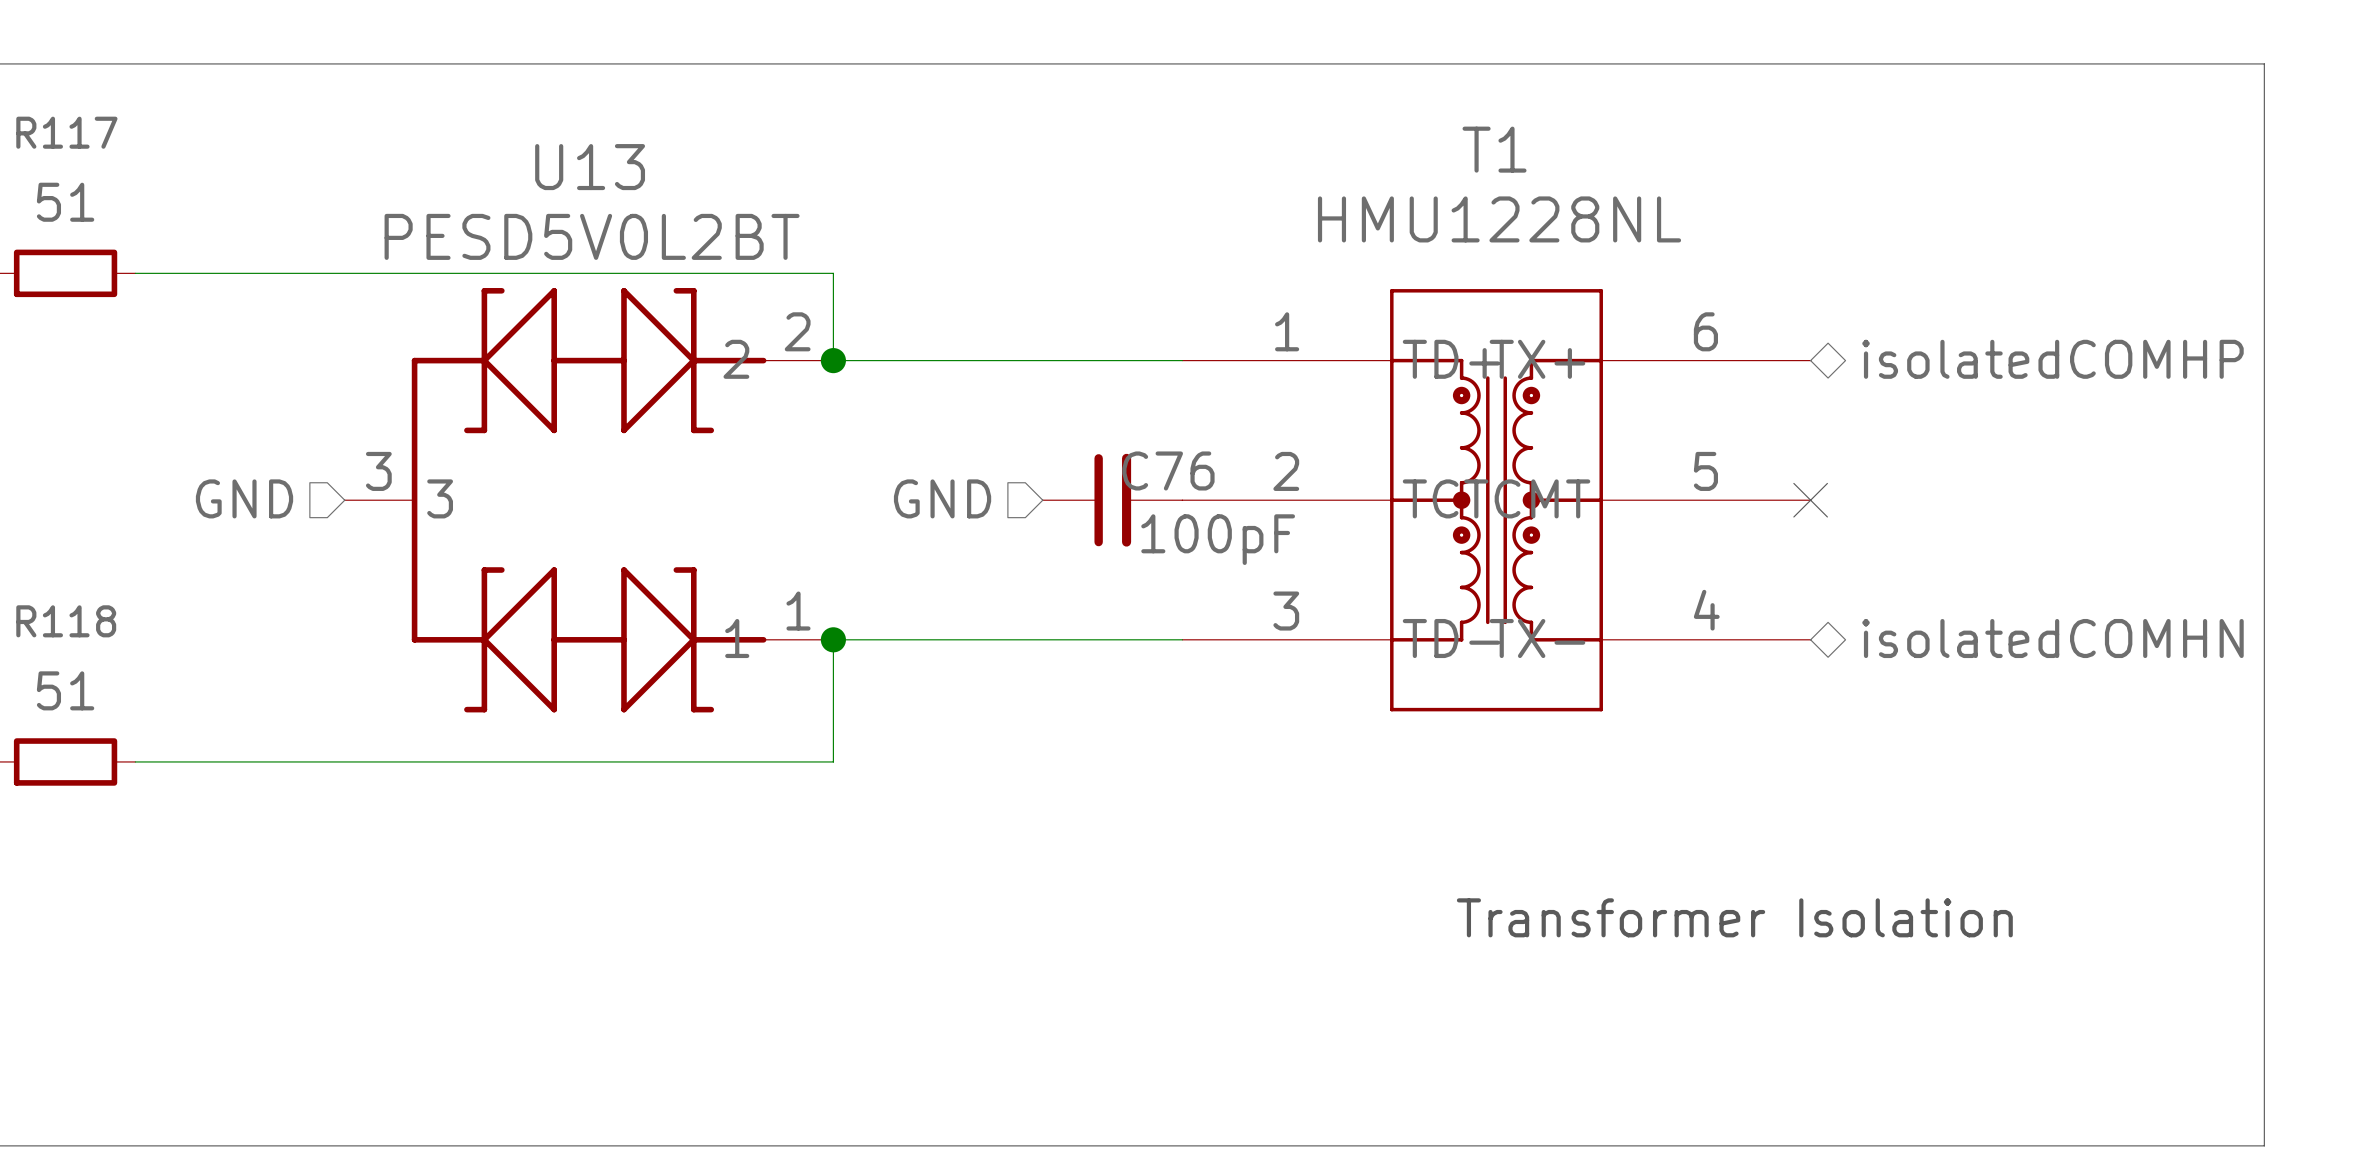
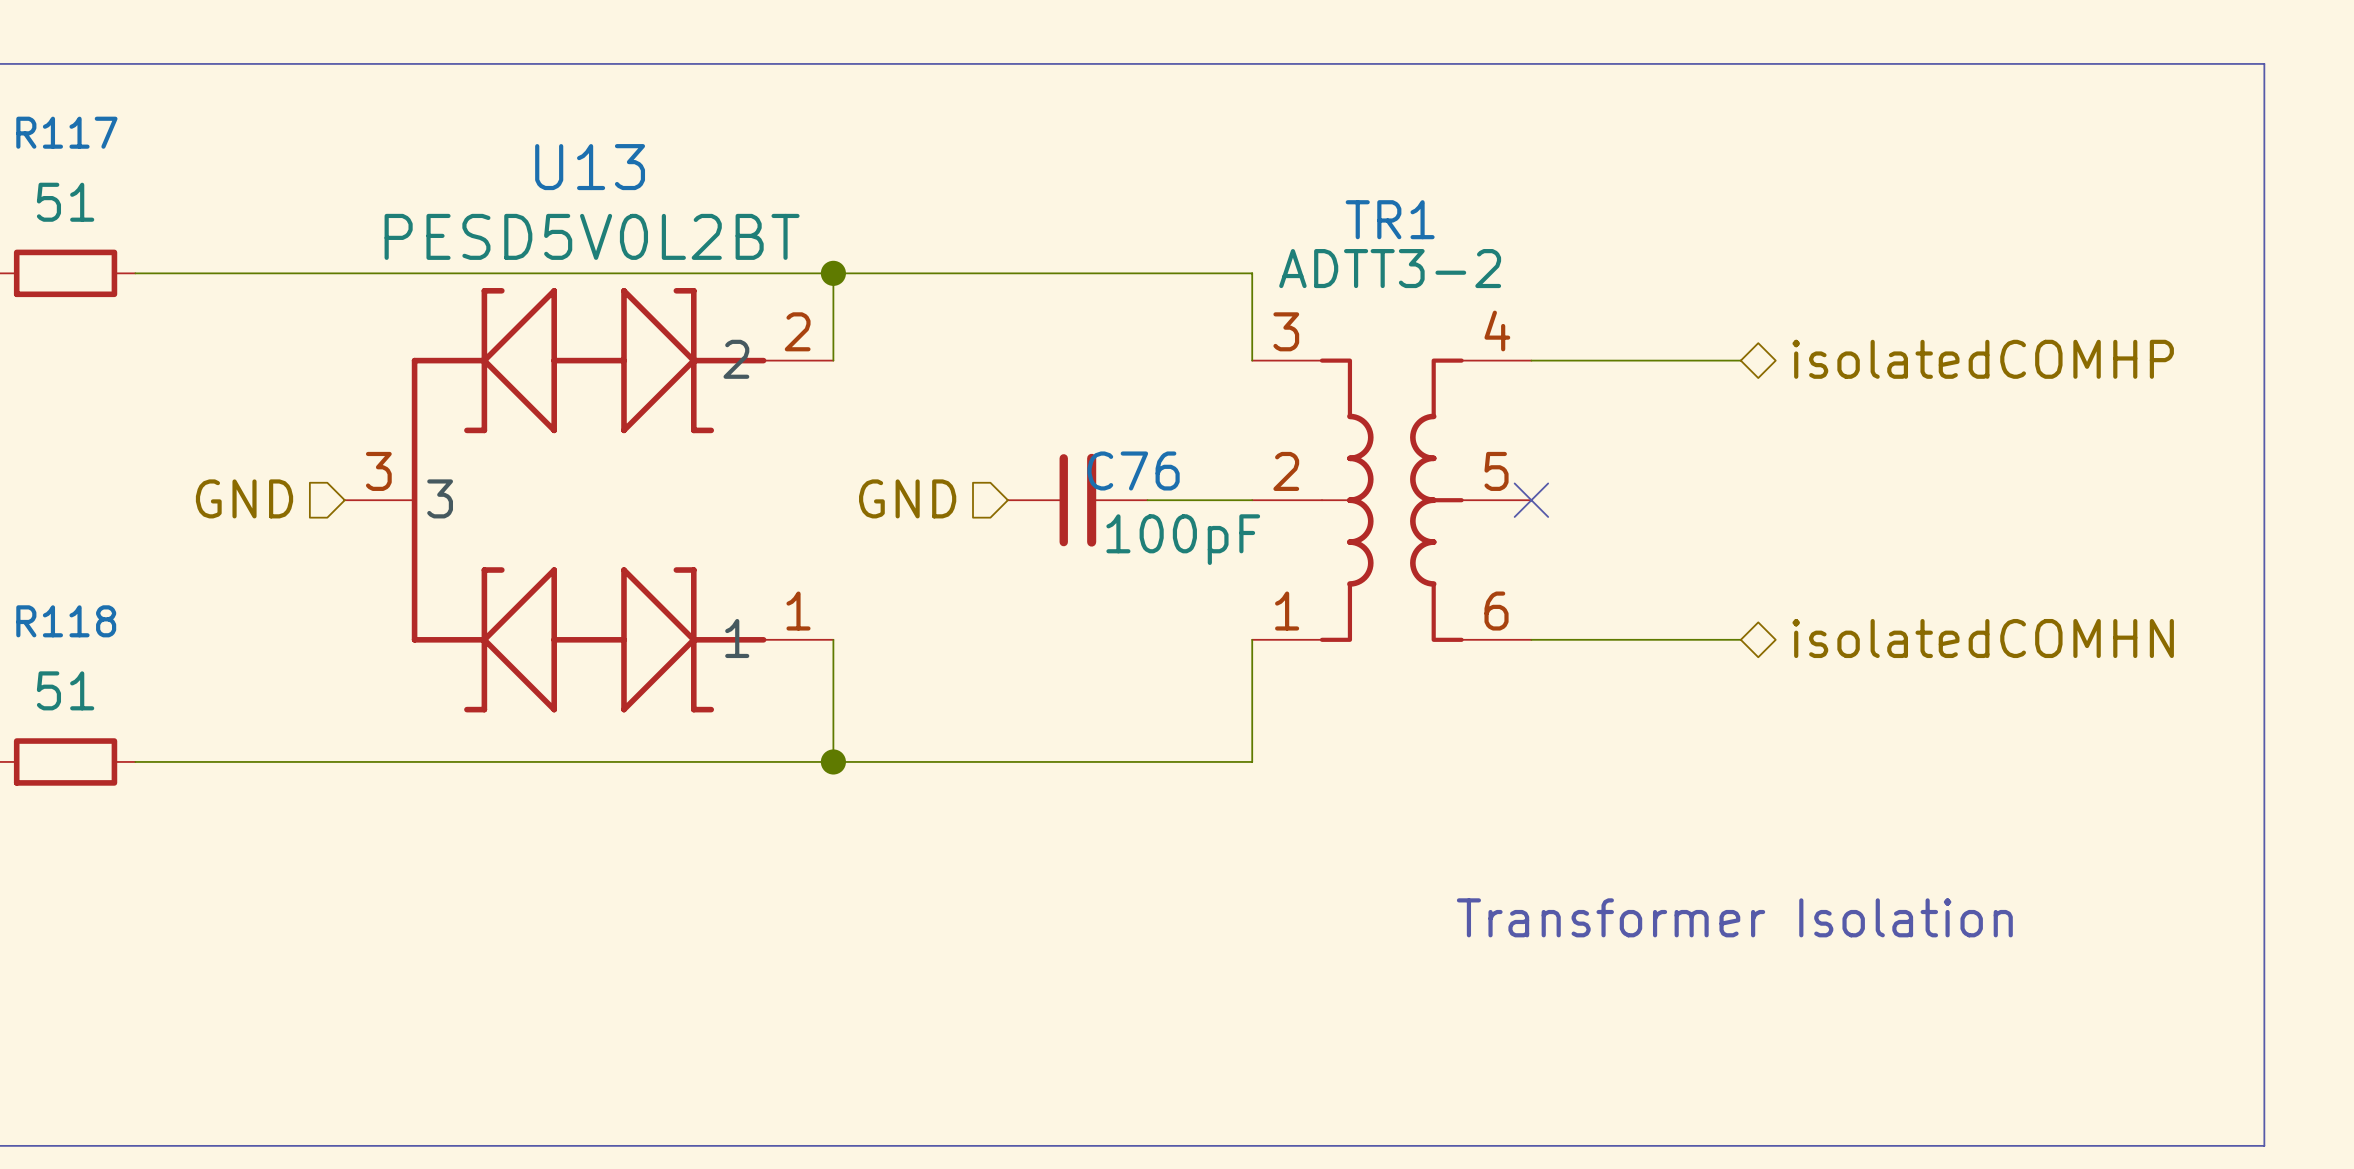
wire: none -> (833, 273) (1252, 273) (1252, 360)
hierarchical label position: isolatedCOMHP (2052, 359) -> isolatedCOMHP (1983, 359)
wire: (833, 360) (1182, 360) -> none
junction position: (833, 360) -> (833, 273)
hierarchical label position: GND (942, 498) -> GND (907, 498)
C76 position: (1112, 500) -> (1077, 500)
TR1: none -> ADTT3-2 (1391, 500)
T1: HMU1228NL (1496, 500) -> none
no-connect mark: none -> (1531, 500)
no-connect mark: (1810, 500) -> none
hierarchical label position: isolatedCOMHN (2052, 638) -> isolatedCOMHN (1983, 638)
wire: (833, 639) (1182, 639) -> none
junction position: (833, 639) -> (833, 761)
wire: none -> (1252, 639) (1252, 761) (833, 761)

